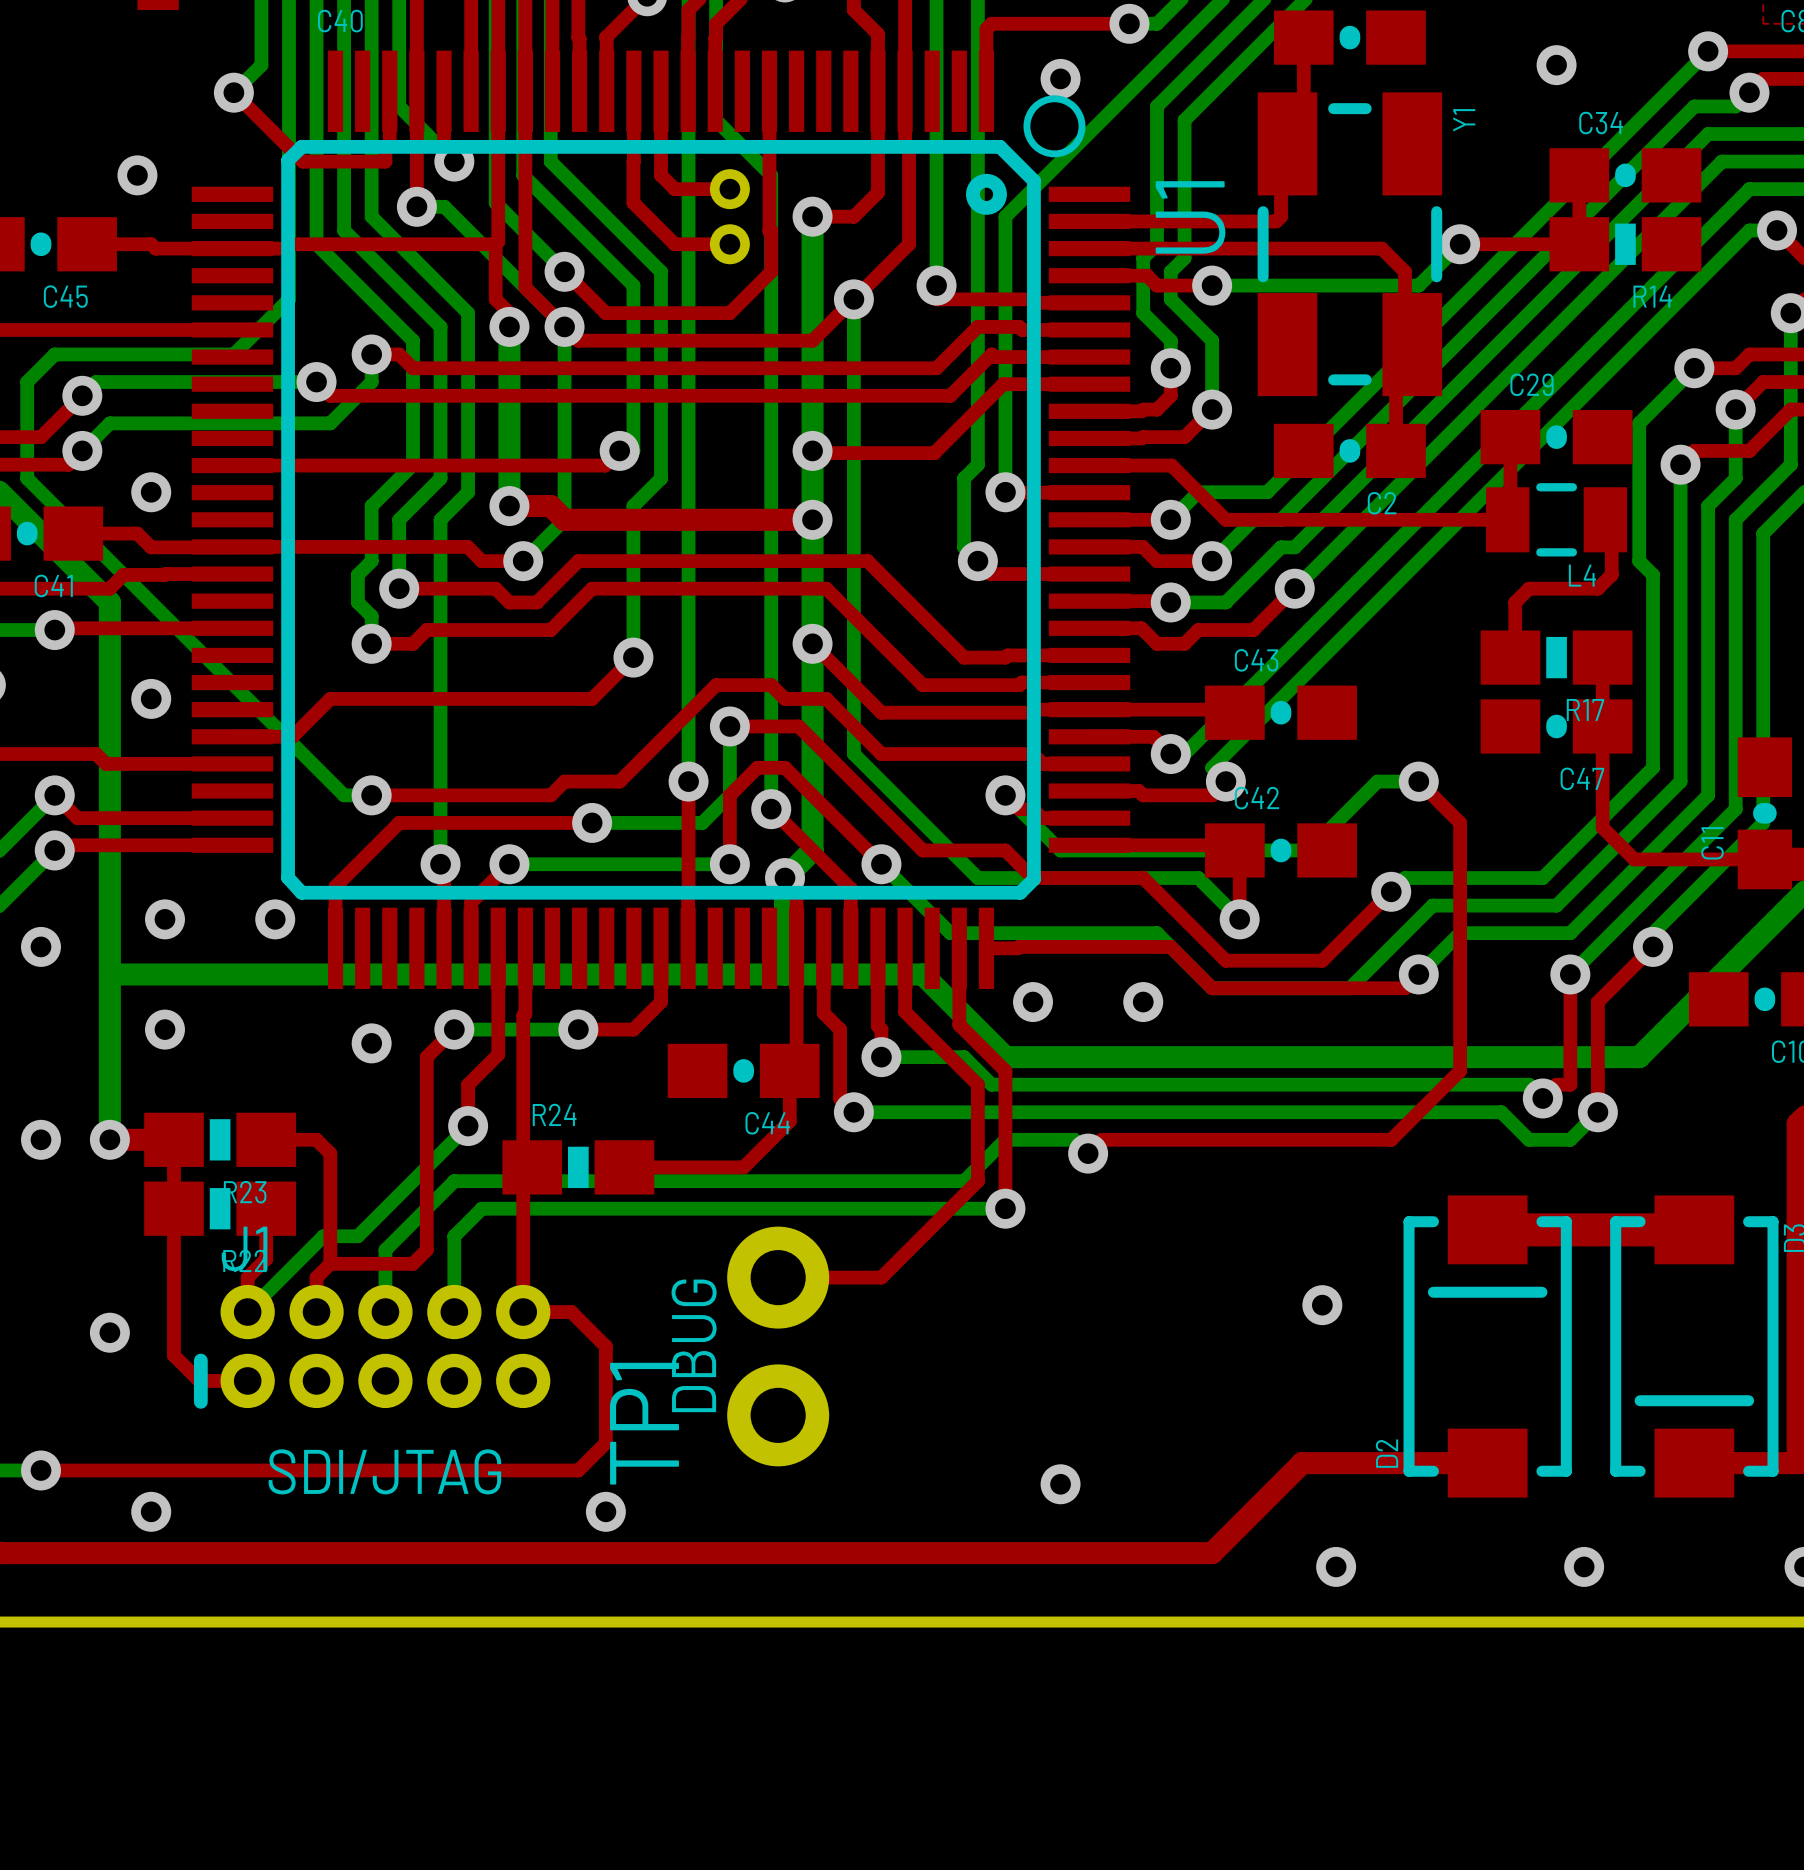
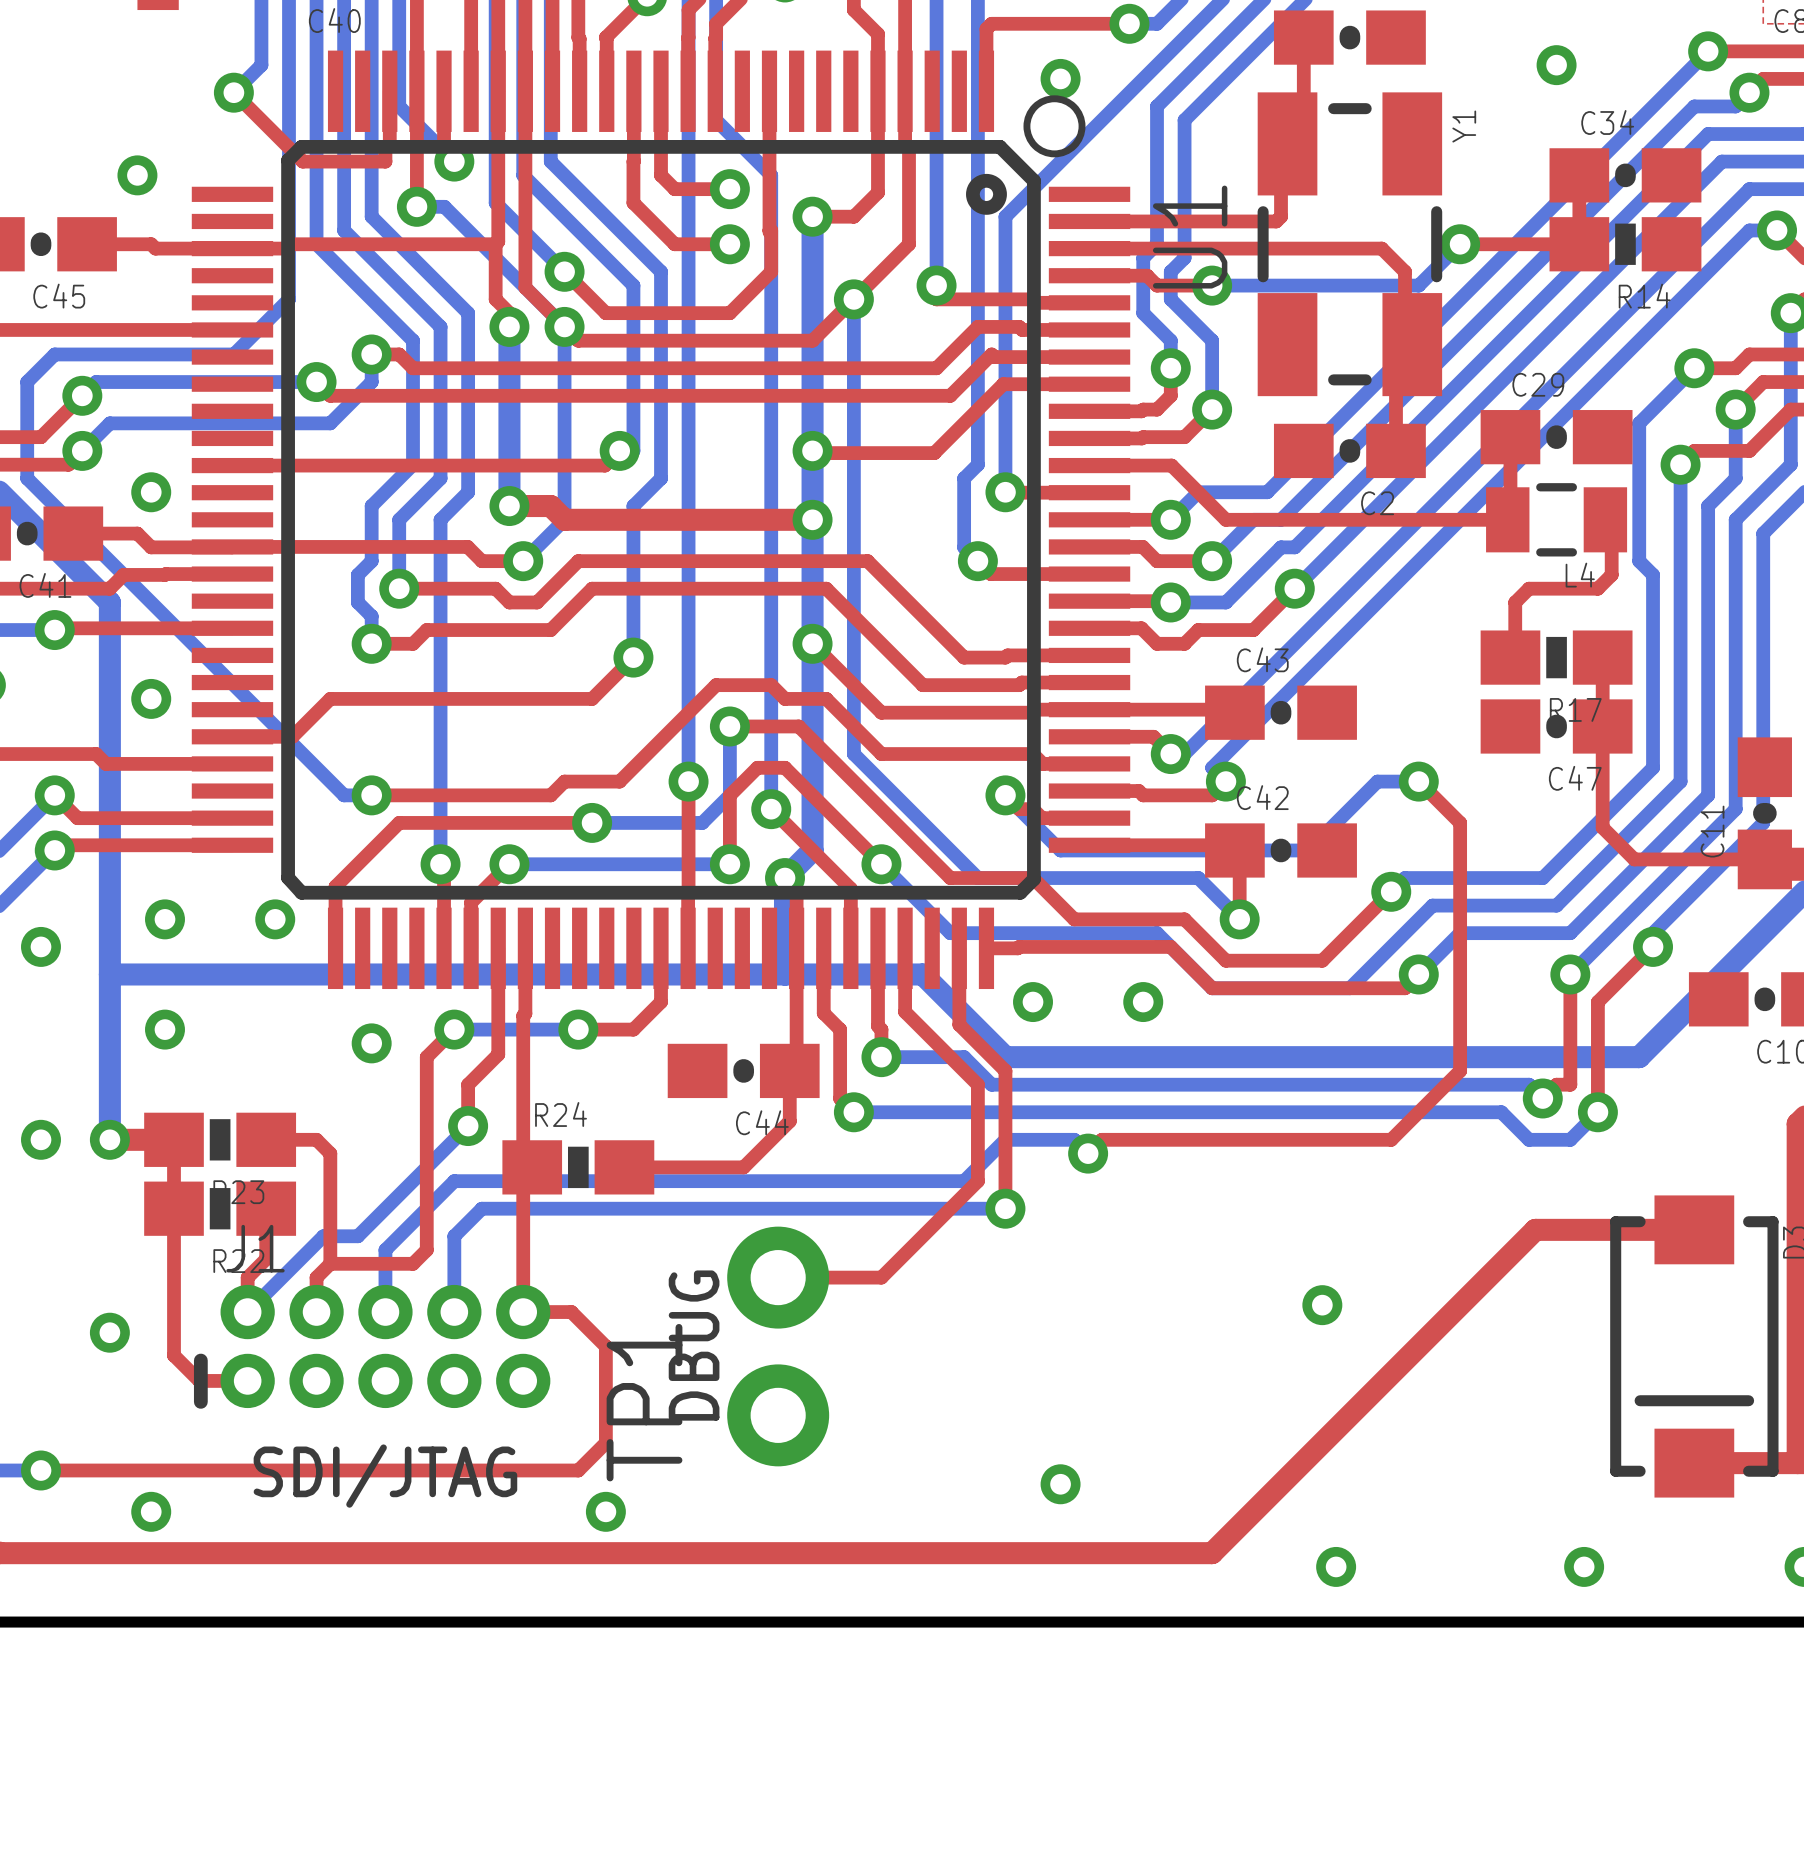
top track: (922, 850) (1005, 850) (1033, 878) (1143, 878) (1184, 919) -> (922, 850) (950, 878) (1033, 878) (1074, 919) (1184, 919)
top track width: thick (1535, 1229) (1694, 1229) -> thin (1535, 1229) (1694, 1229)
D2: (1487, 1346) -> none
top track: (1302, 1463) (1487, 1463) -> (1302, 1463) (1535, 1229)

